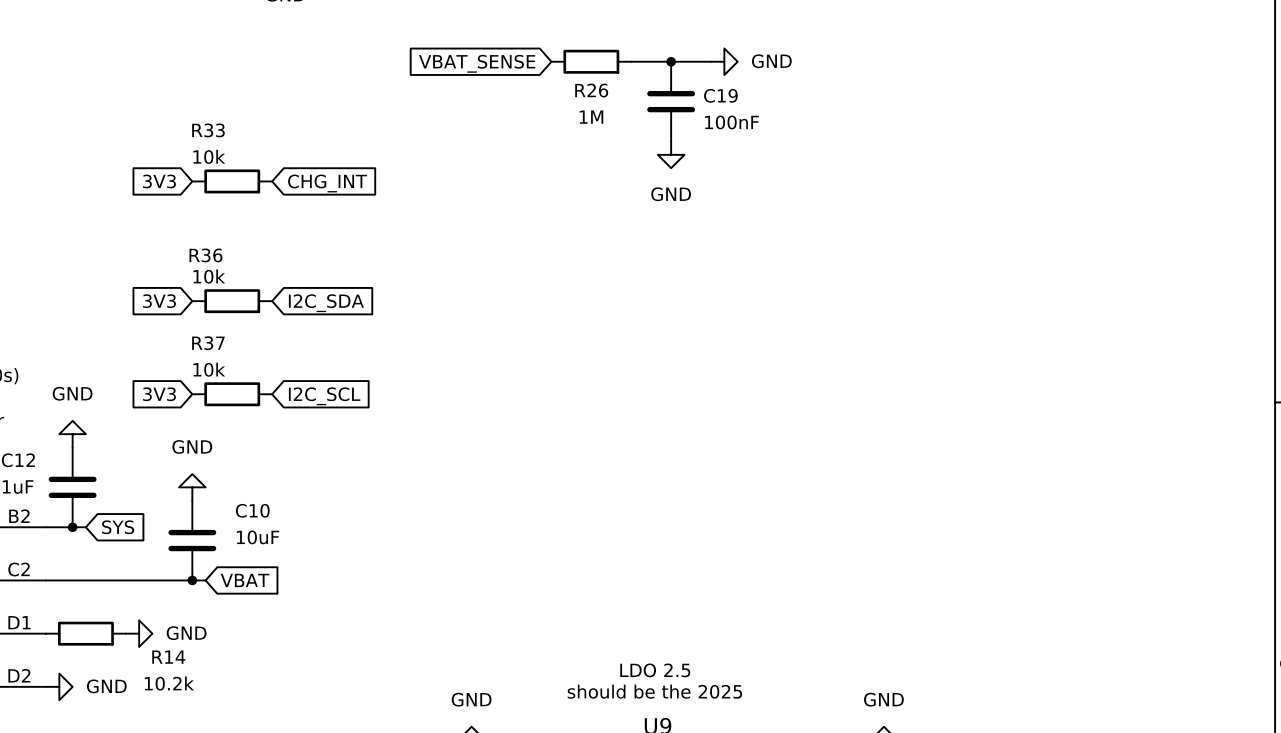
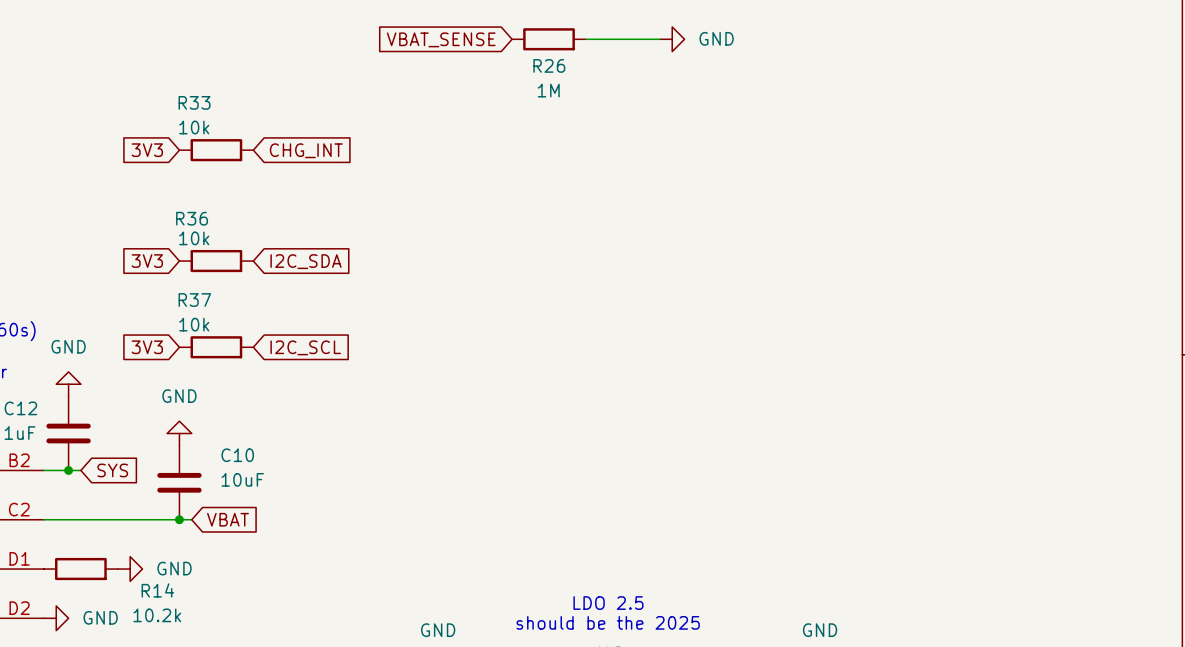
junction: (671, 61) -> none
C19: 100nF (671, 101) -> none
power symbol: GND (671, 154) -> none

